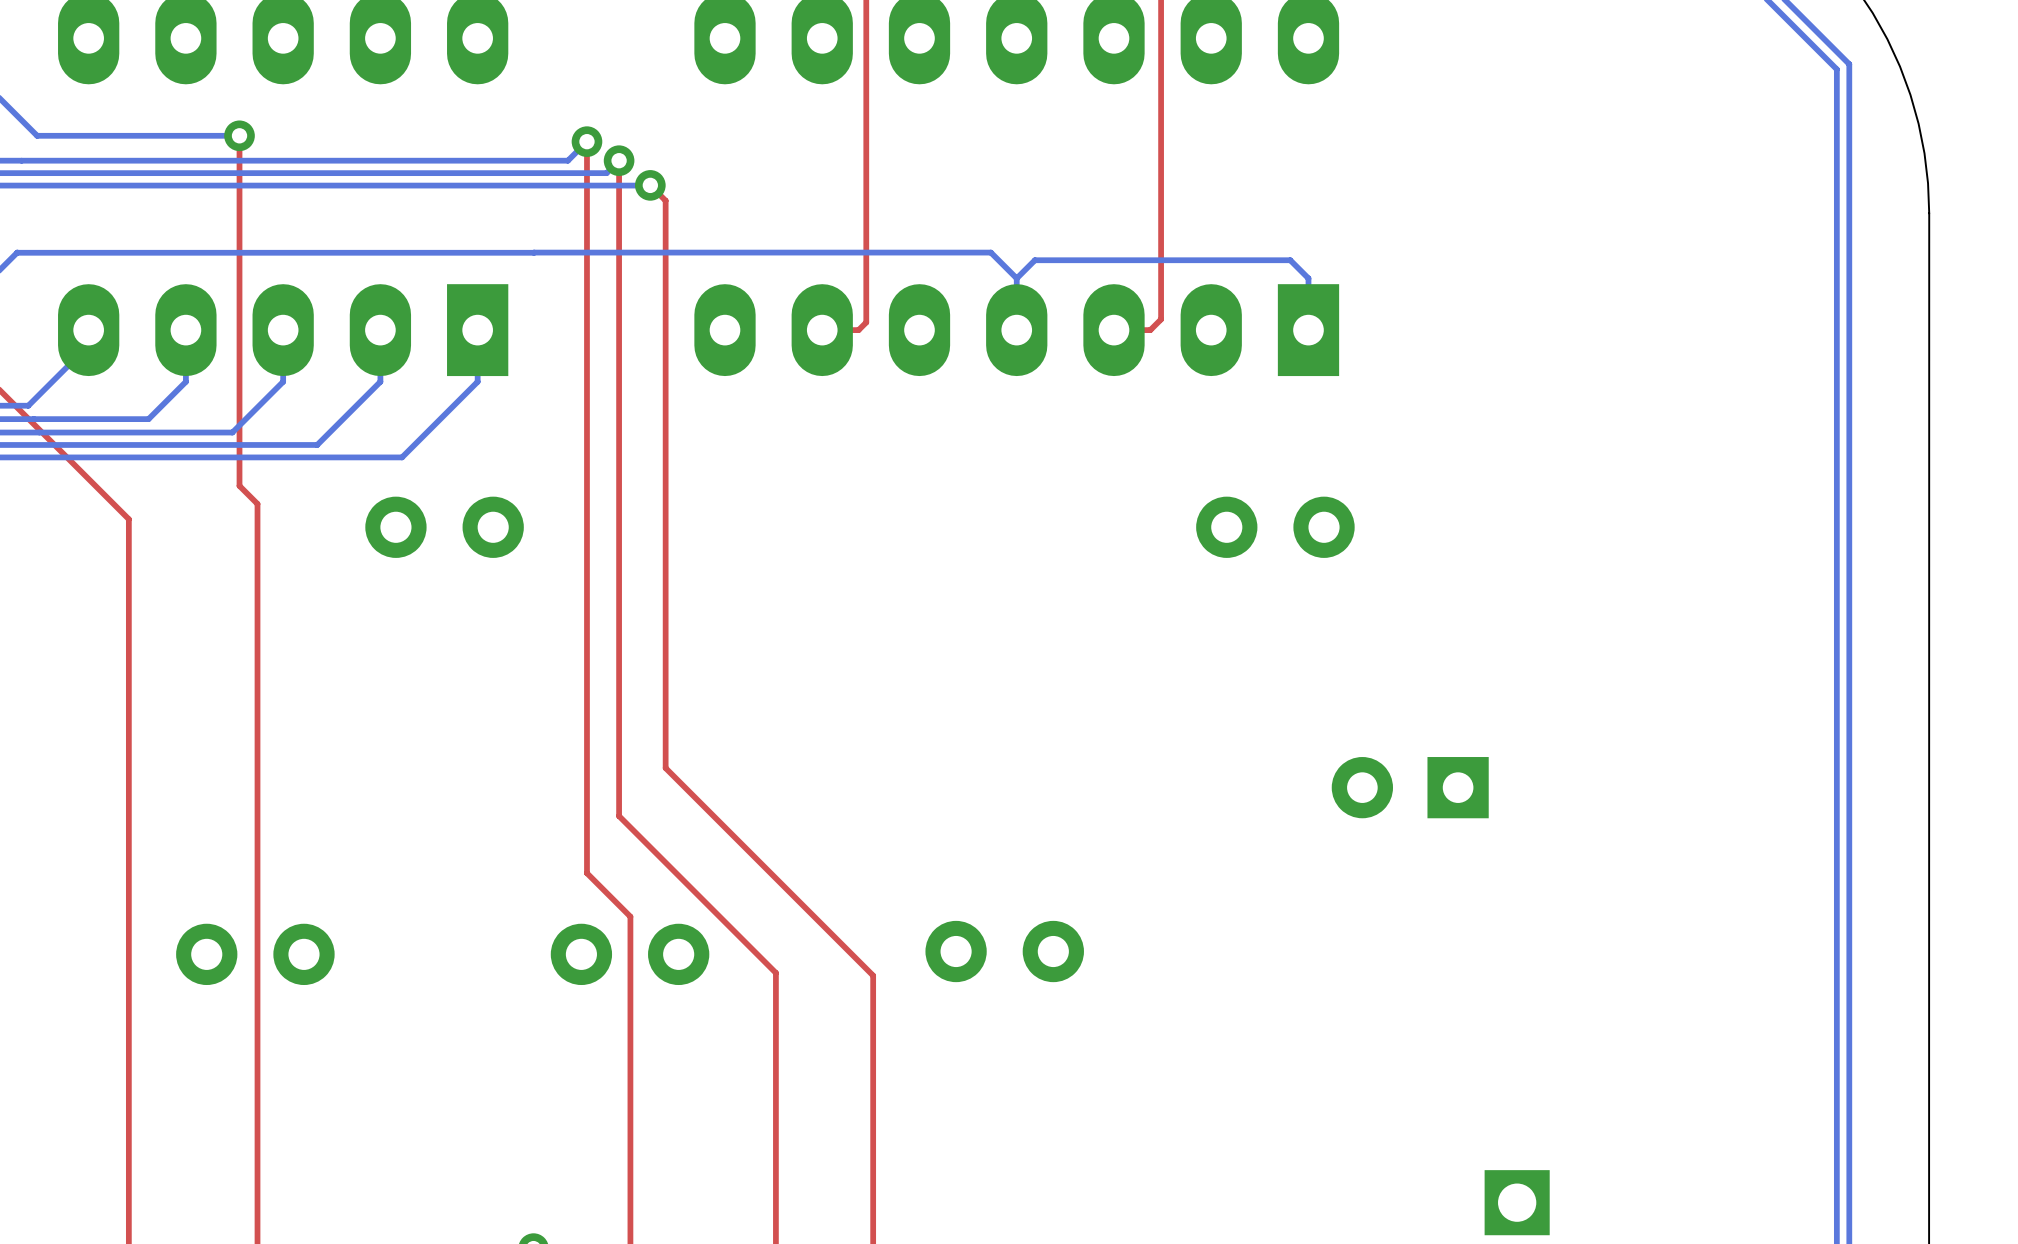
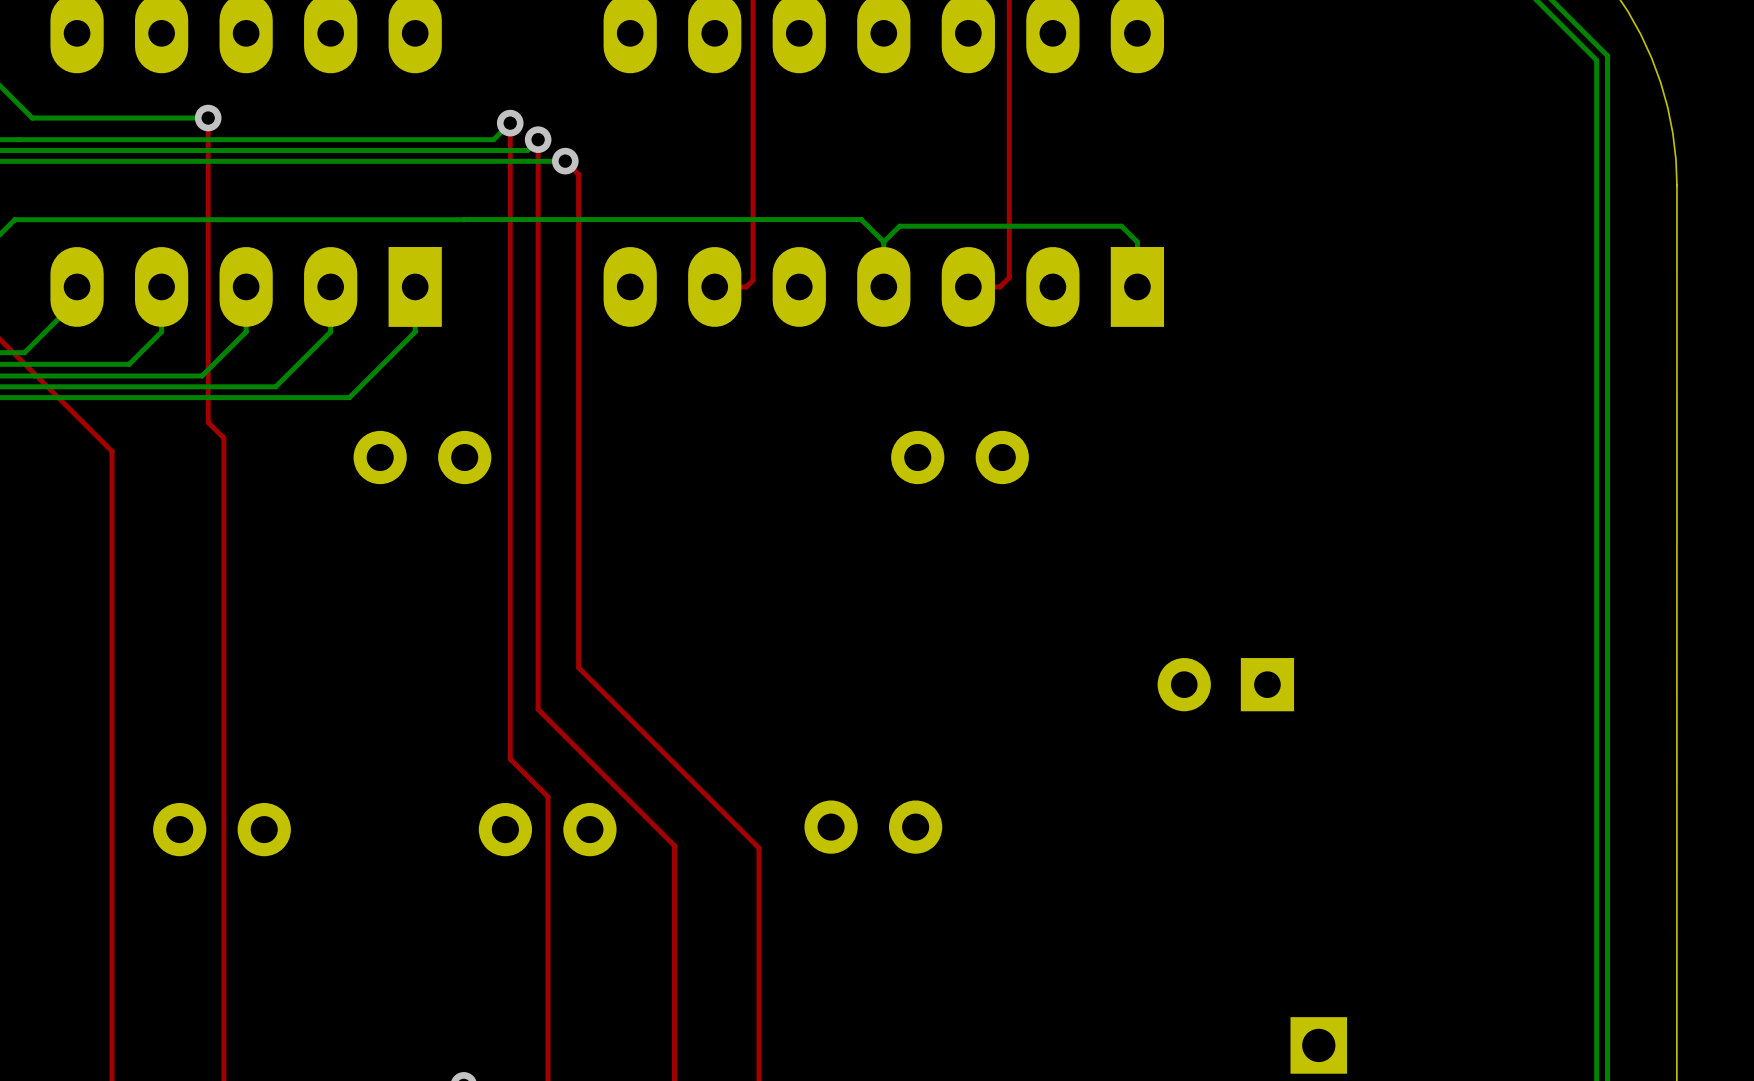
part position: (444, 527) -> (422, 457)
part position: (1275, 527) -> (960, 457)

